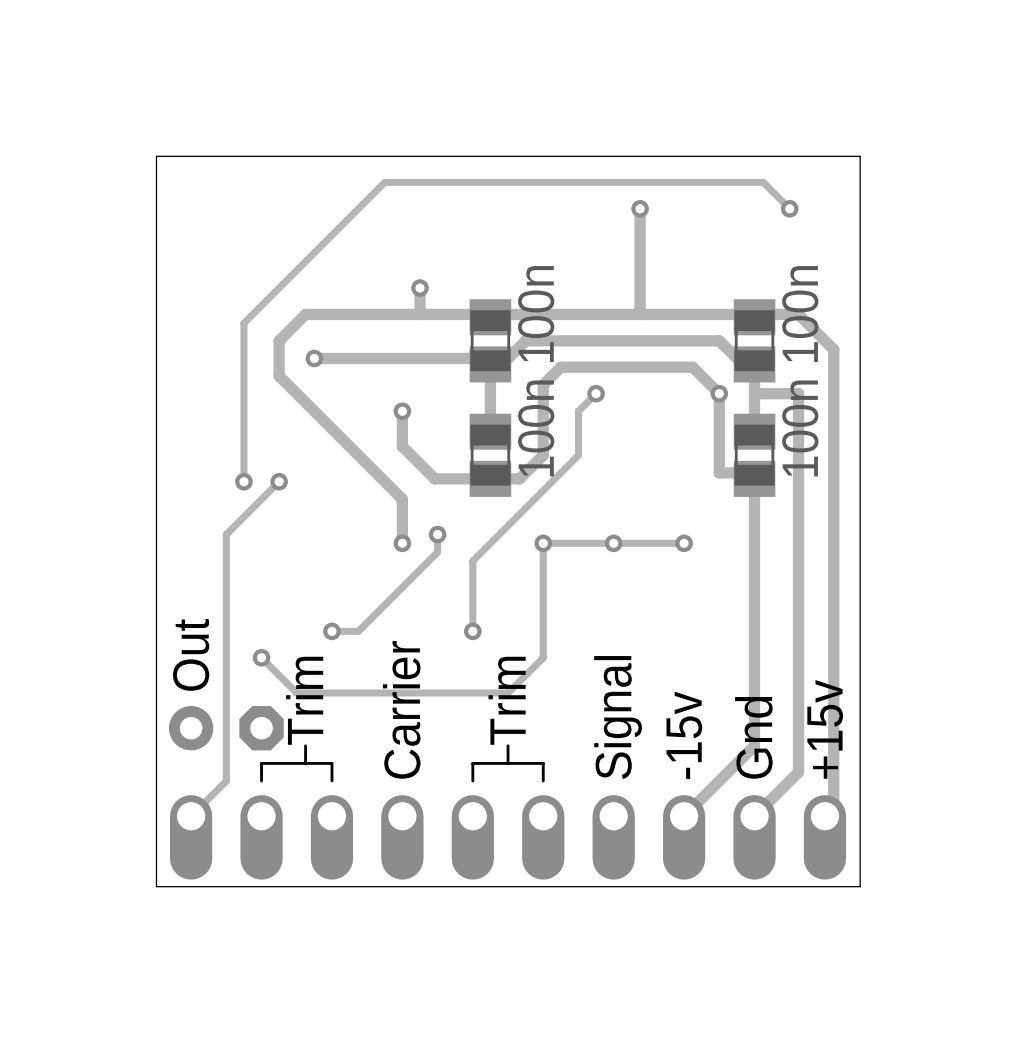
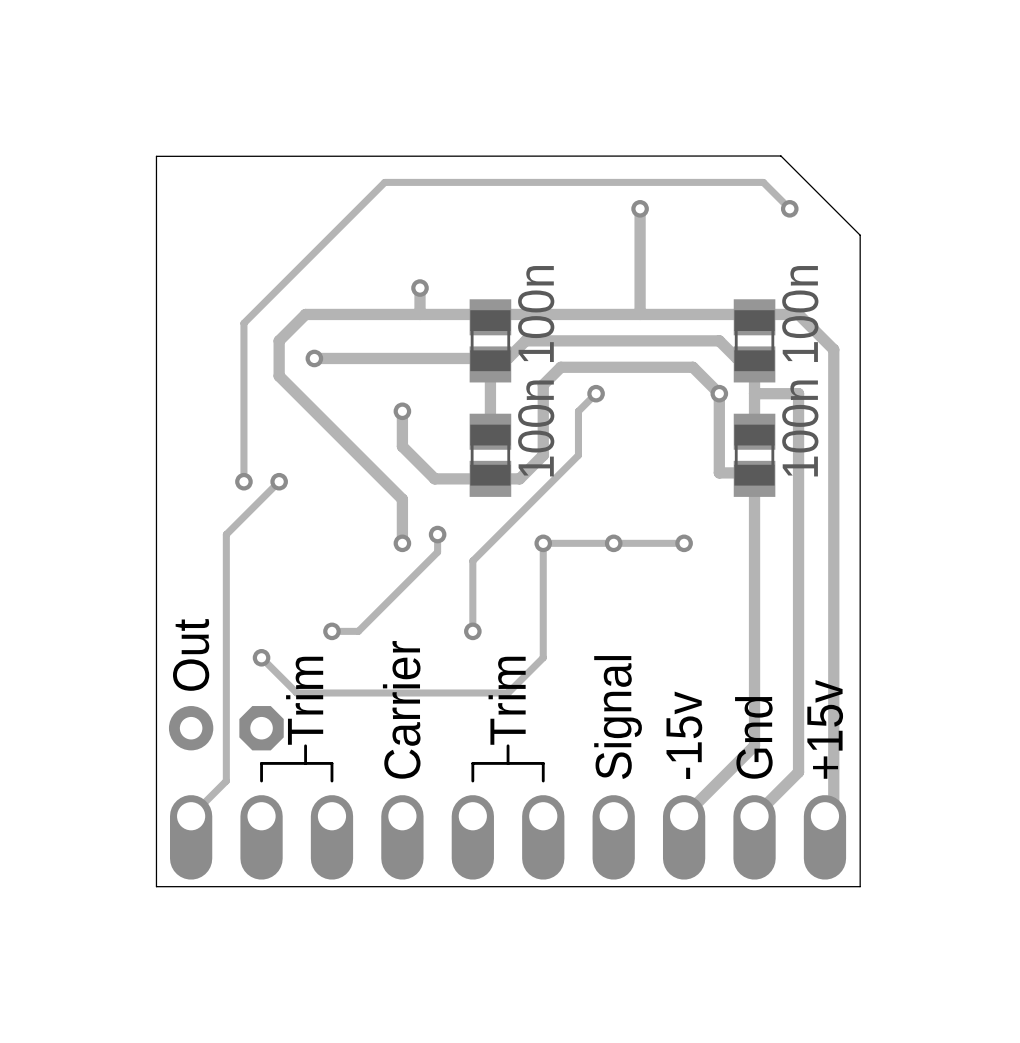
board edge: (156, 156) (860, 156) (860, 235) -> (156, 156) (780, 155) (860, 235)

